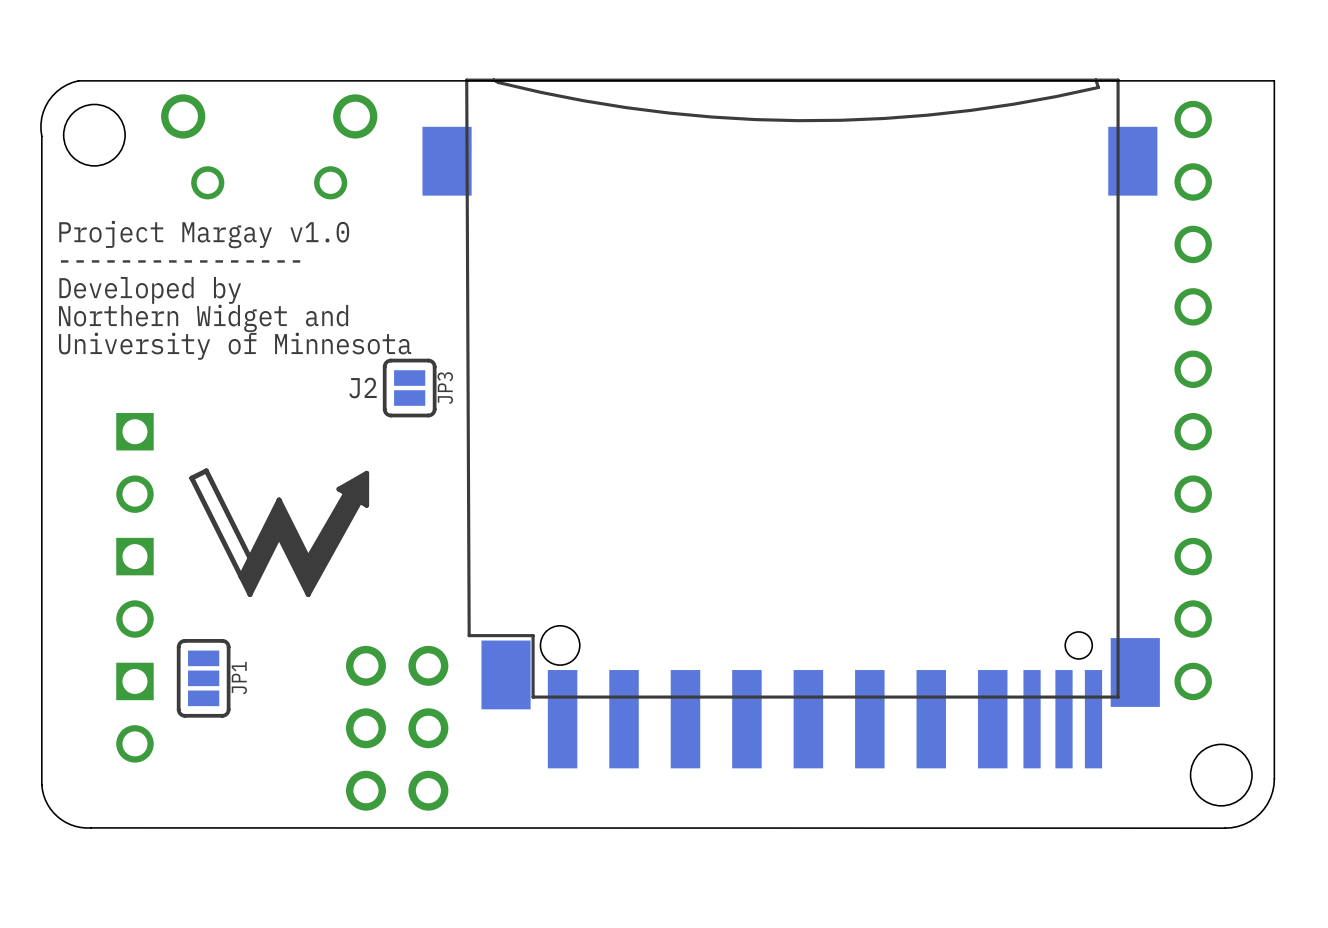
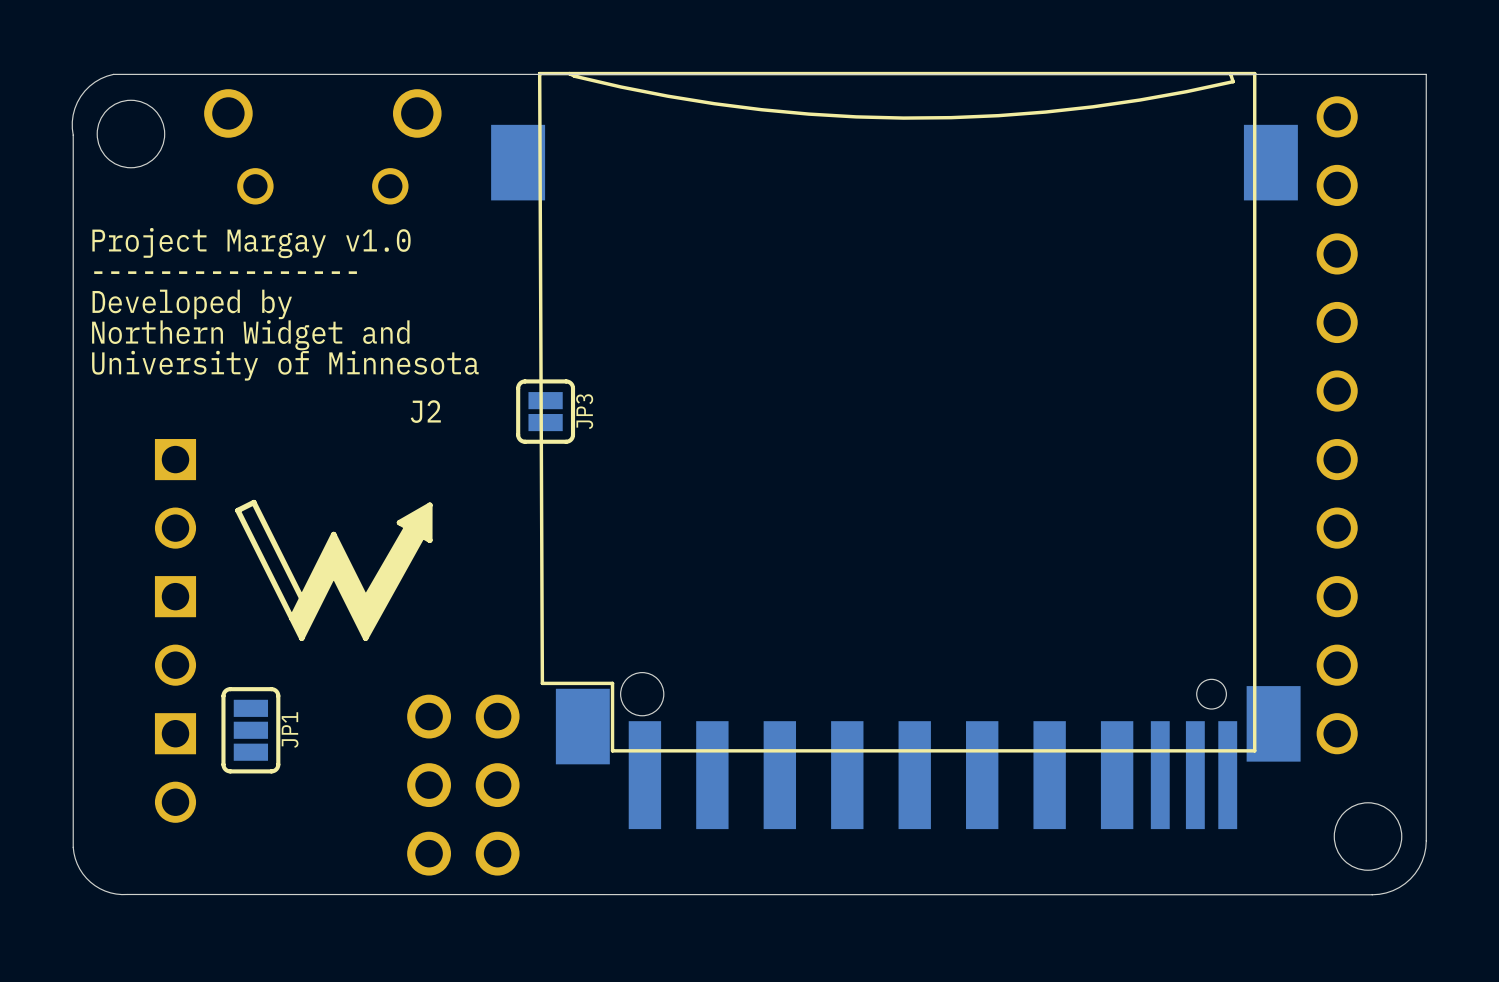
JP3 position: (409, 388) -> (545, 411)

